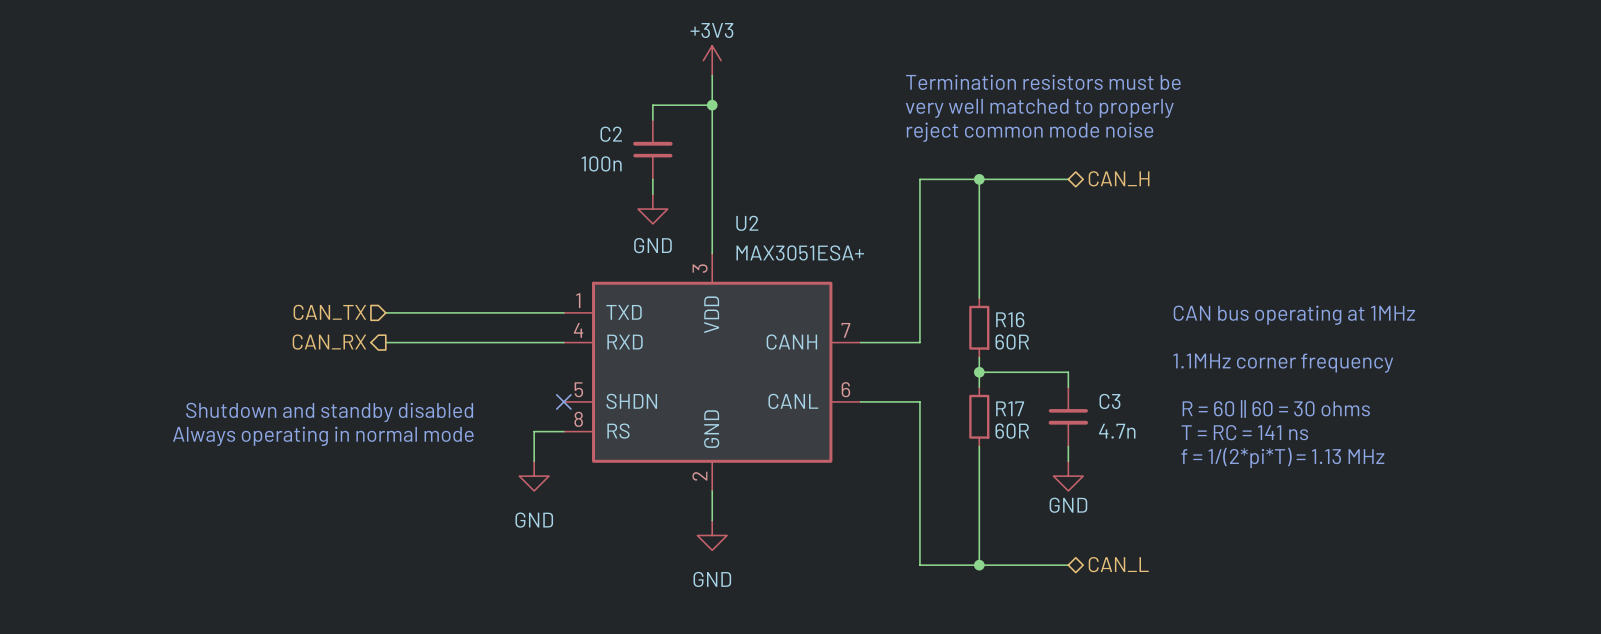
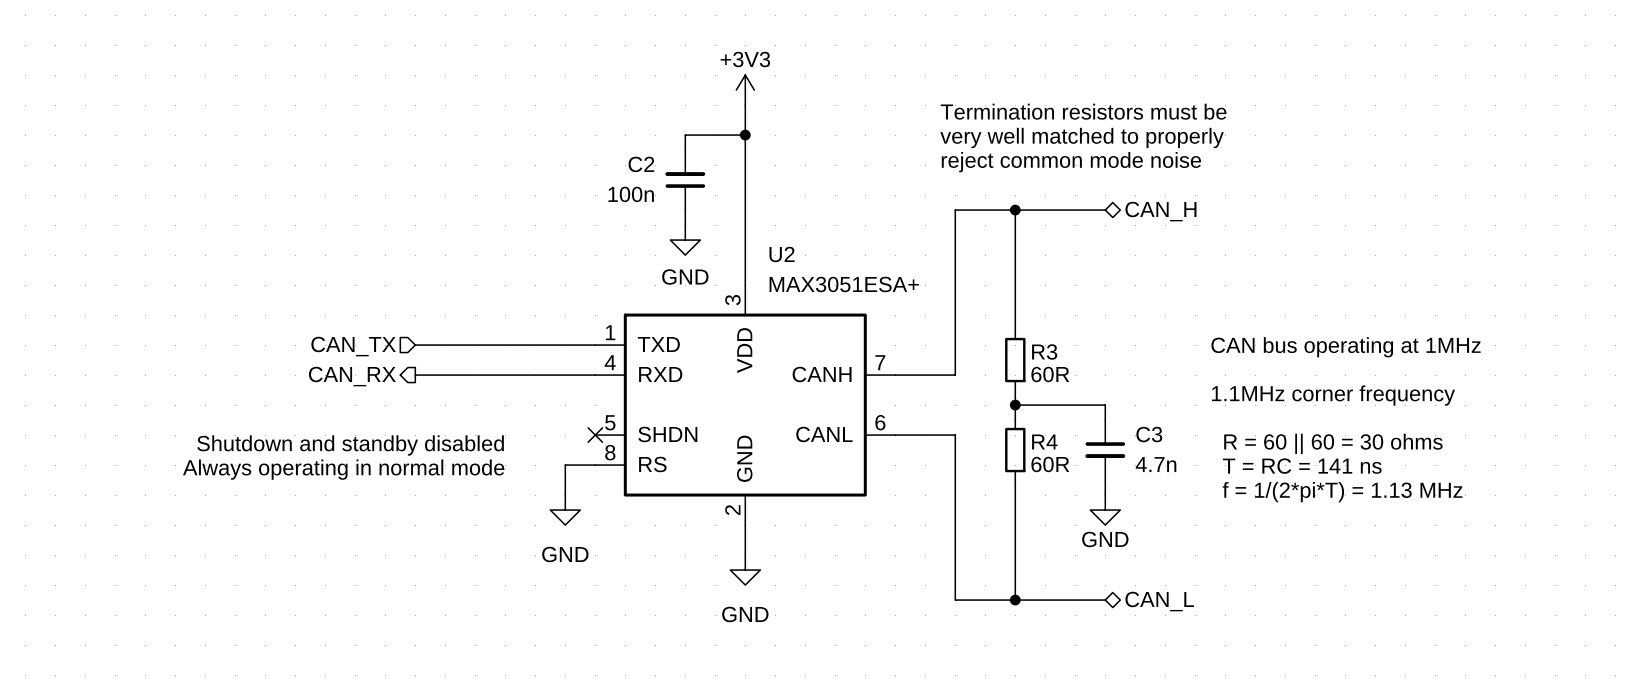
R16 name: R16 (1010, 319) -> R3 (1044, 351)
R17 name: R17 (1010, 408) -> R4 (1044, 441)

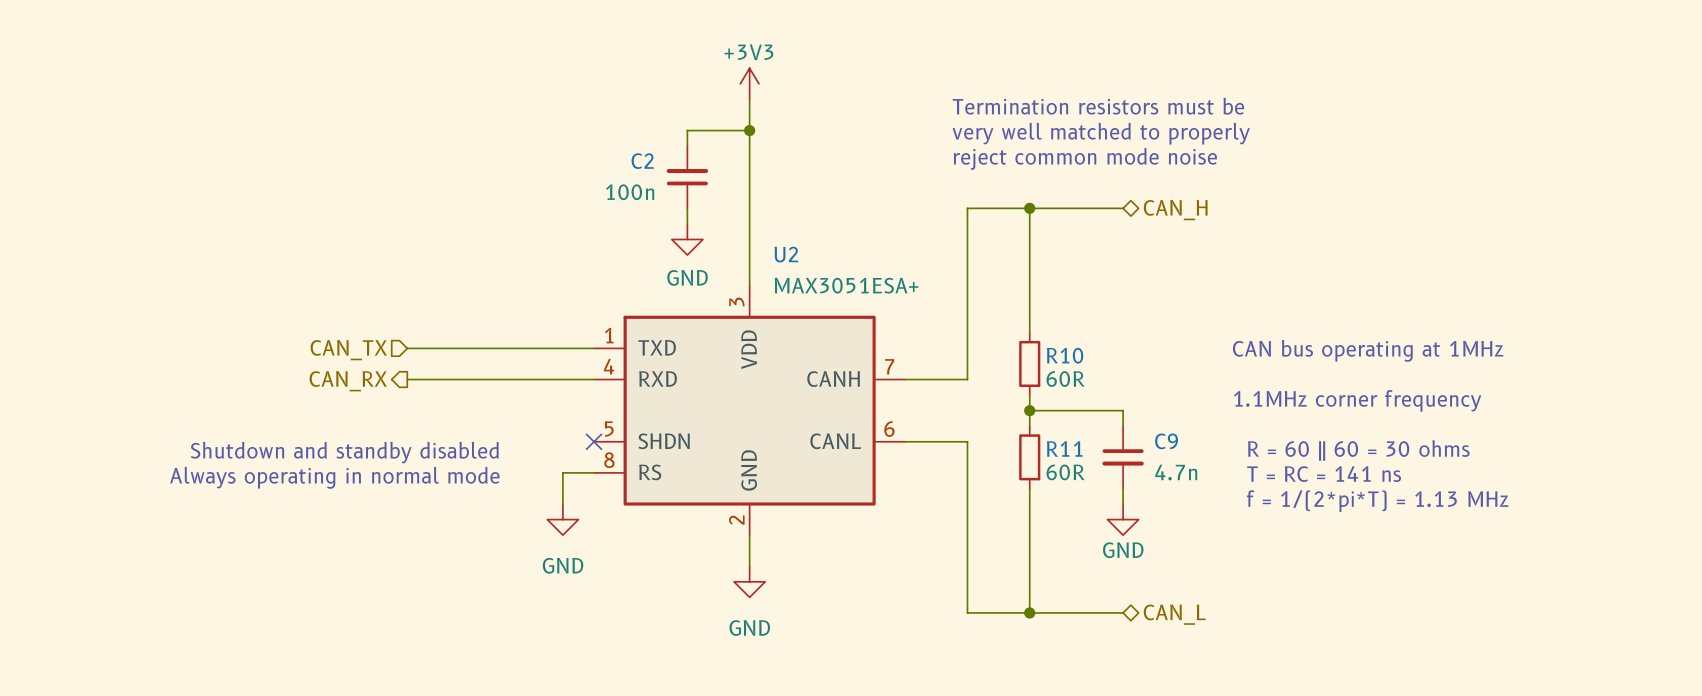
R3 name: R3 (1044, 351) -> R10 (1065, 355)
C3 name: C3 (1149, 434) -> C9 (1166, 441)
R4 name: R4 (1044, 441) -> R11 (1064, 448)

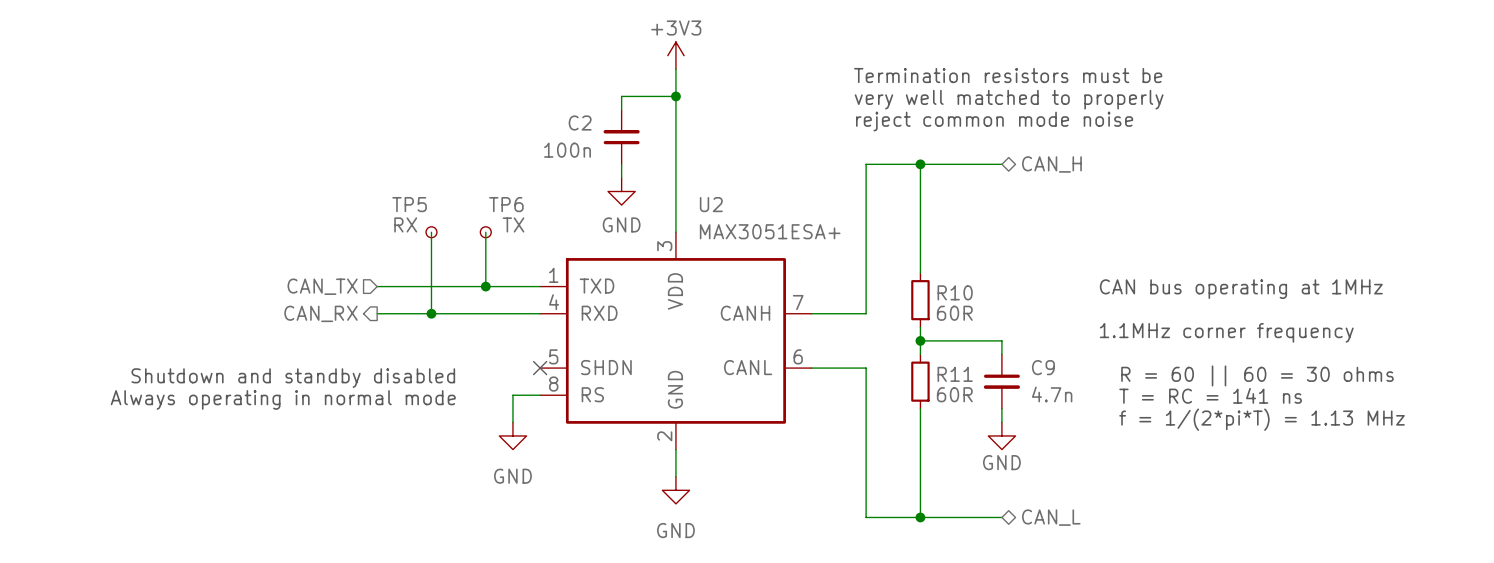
wire: none -> (431, 232) (431, 313)
TP5: none -> RX (431, 232)
wire: none -> (485, 232) (485, 286)
TP6: none -> TX (485, 232)
junction: none -> (485, 286)
junction: none -> (431, 313)

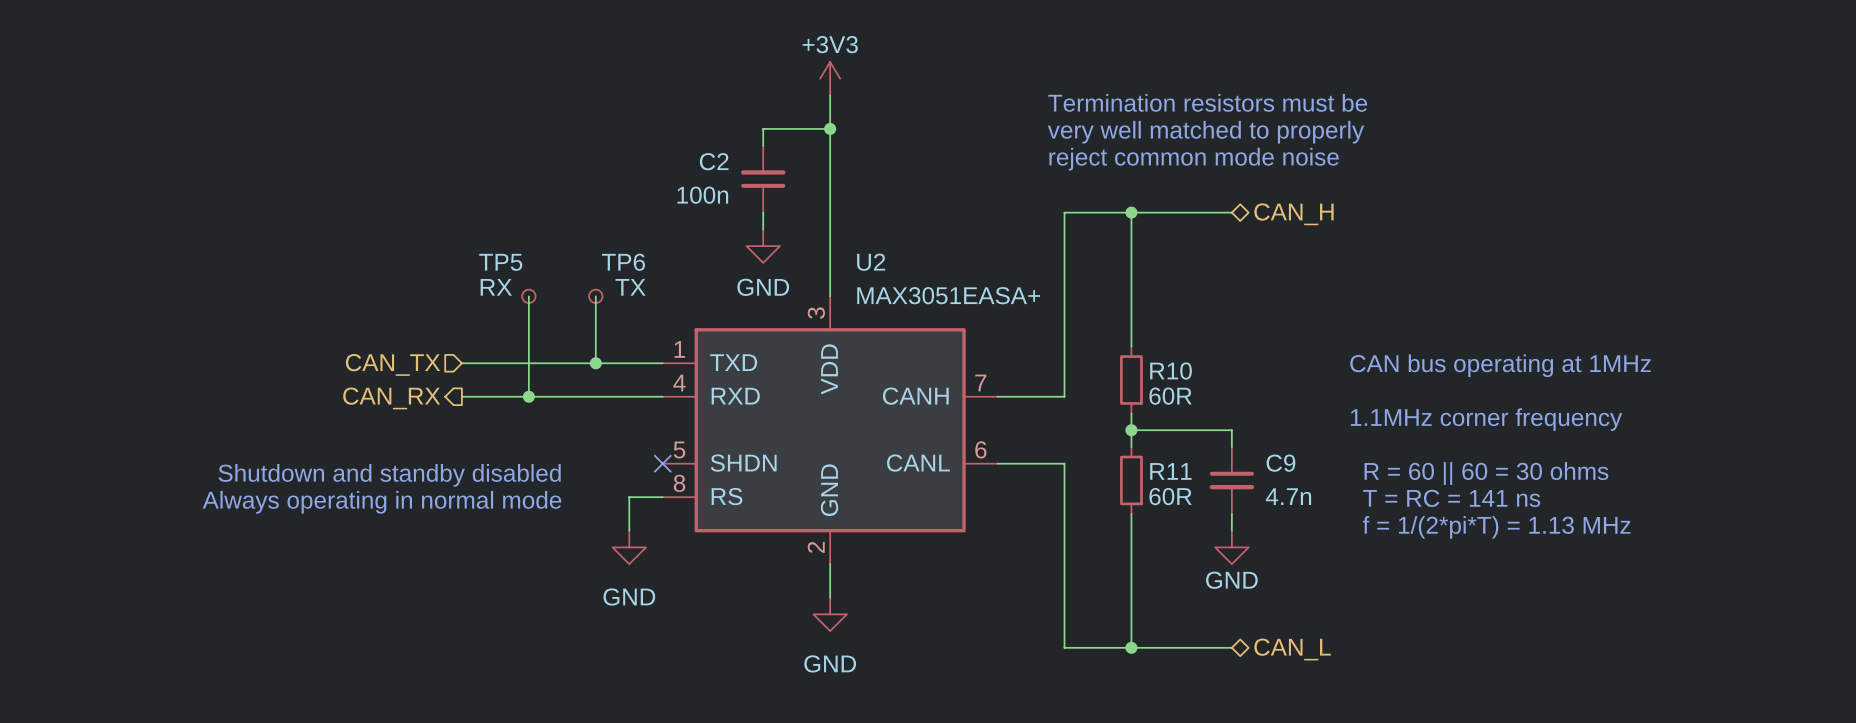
U2 value: MAX3051ESA+ (770, 231) -> MAX3051EASA+ (948, 295)

